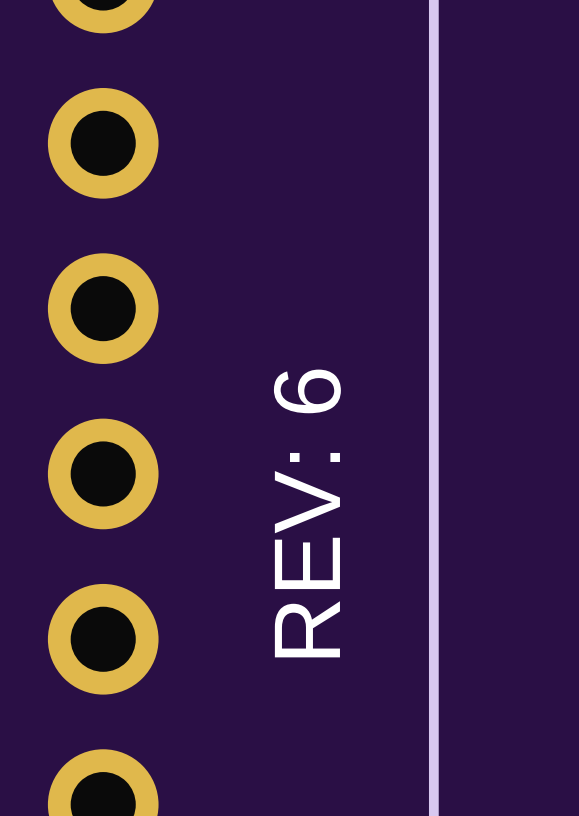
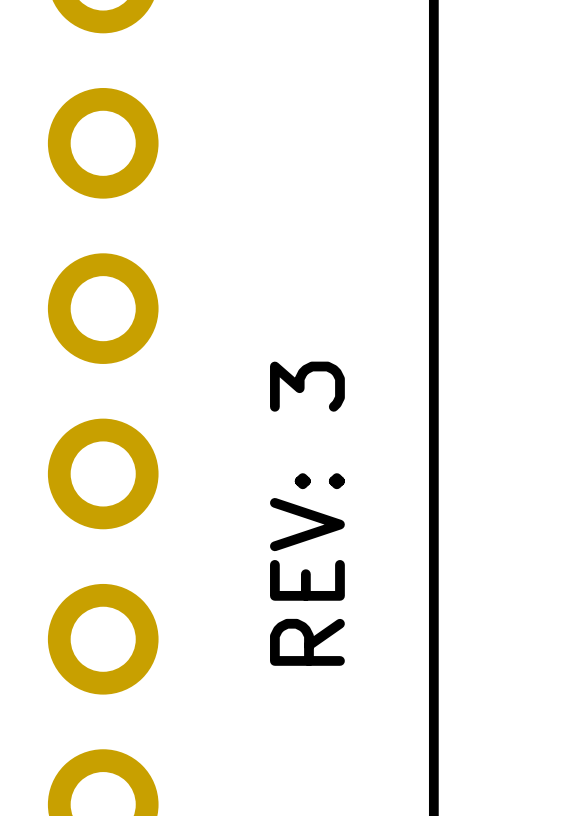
text: REV: 6 (307, 513) -> REV: 3 (307, 513)

